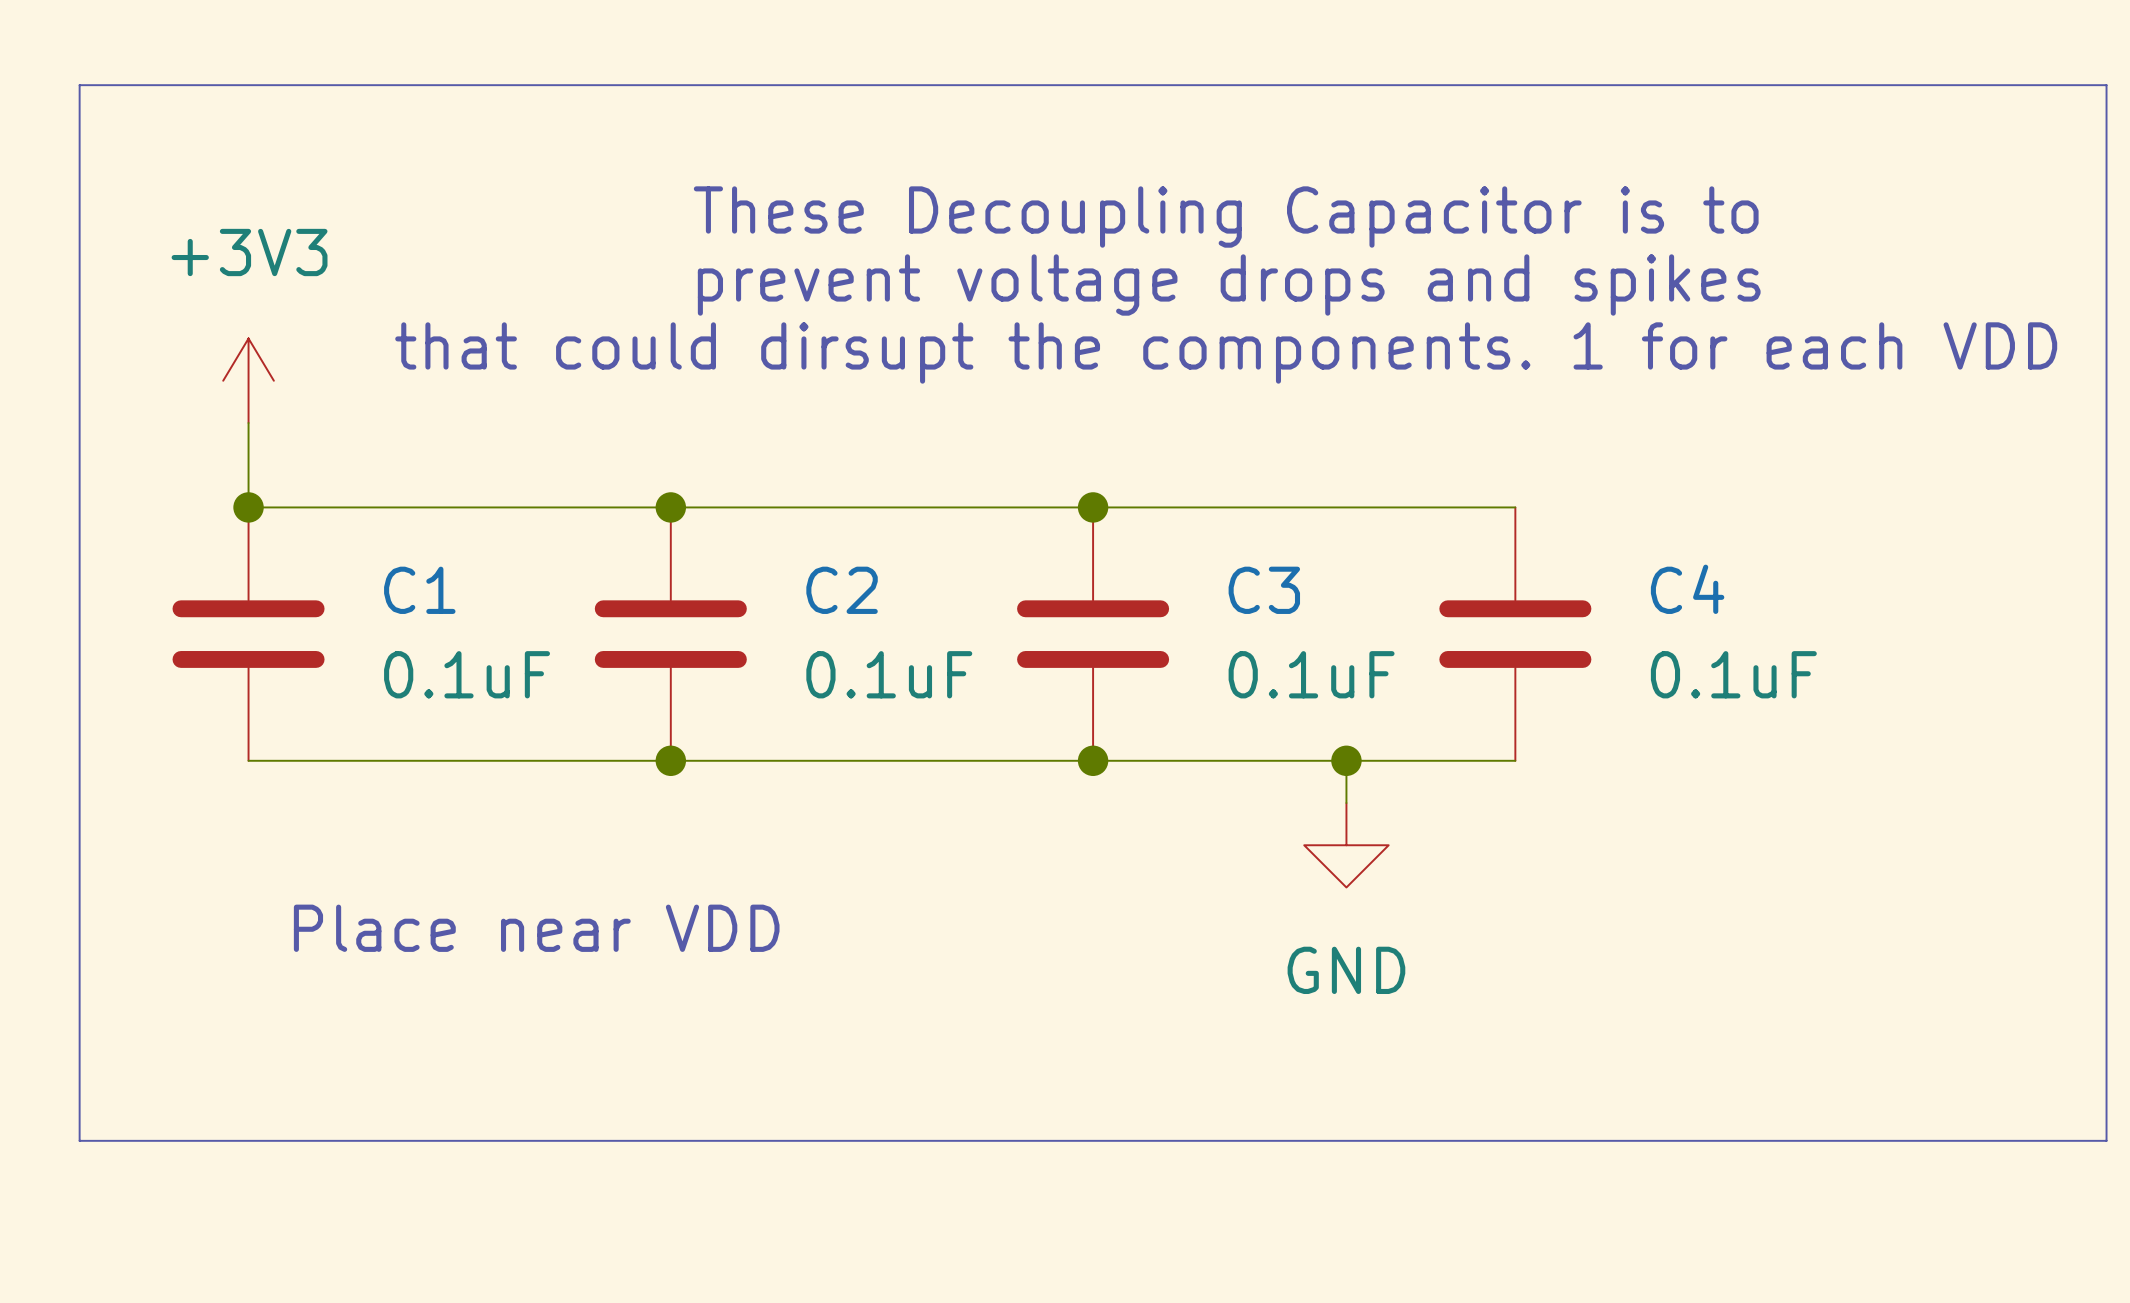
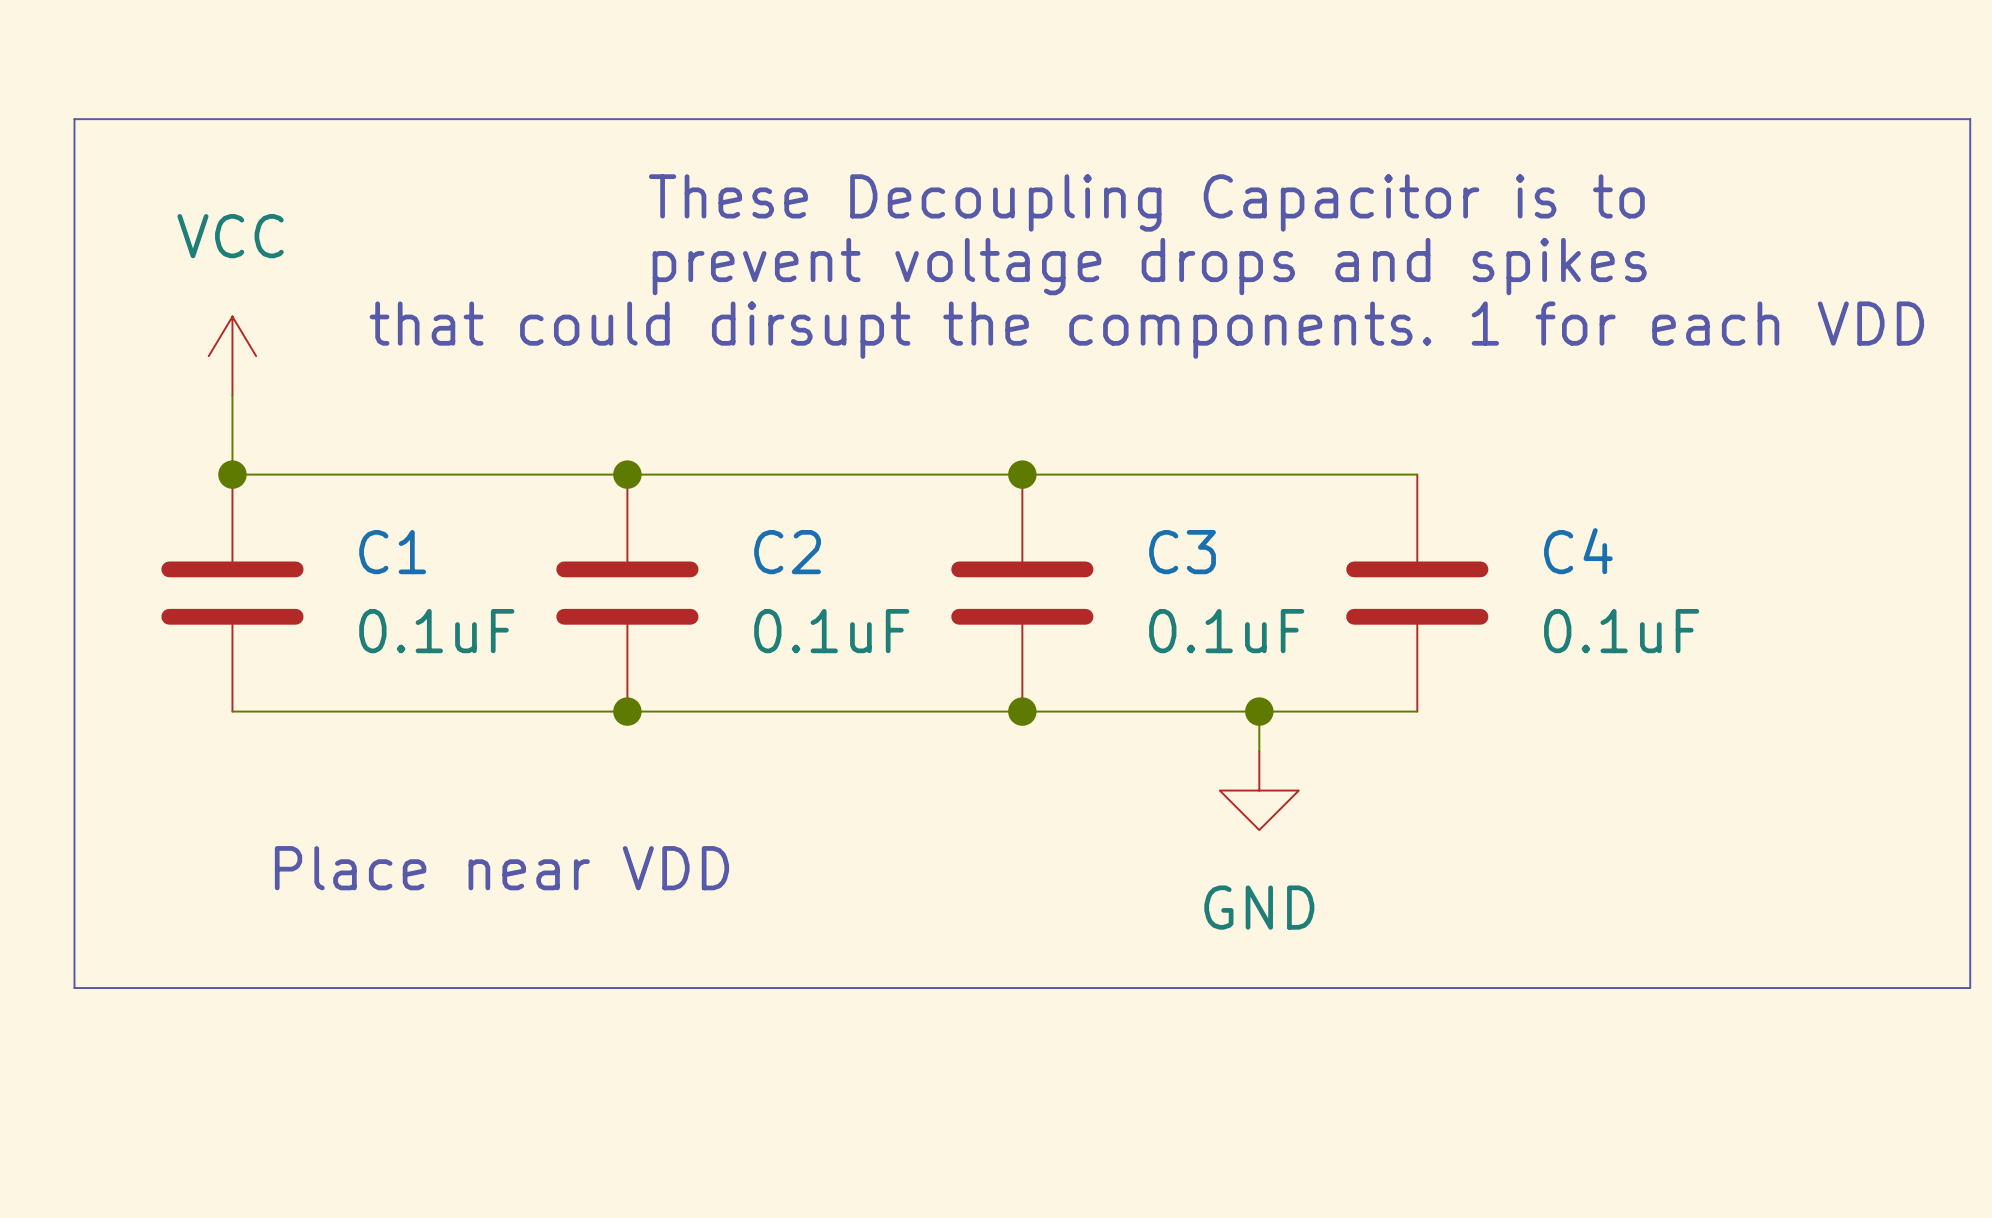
bus: (79, 127) (79, 85) (2106, 85) (2106, 127) -> (74, 119) (1970, 119)
power symbol: +3V3 (248, 380) -> VCC (232, 356)
bus: (79, 1056) (79, 1140) (2106, 1140) (2106, 1056) -> (74, 988) (1970, 988)

